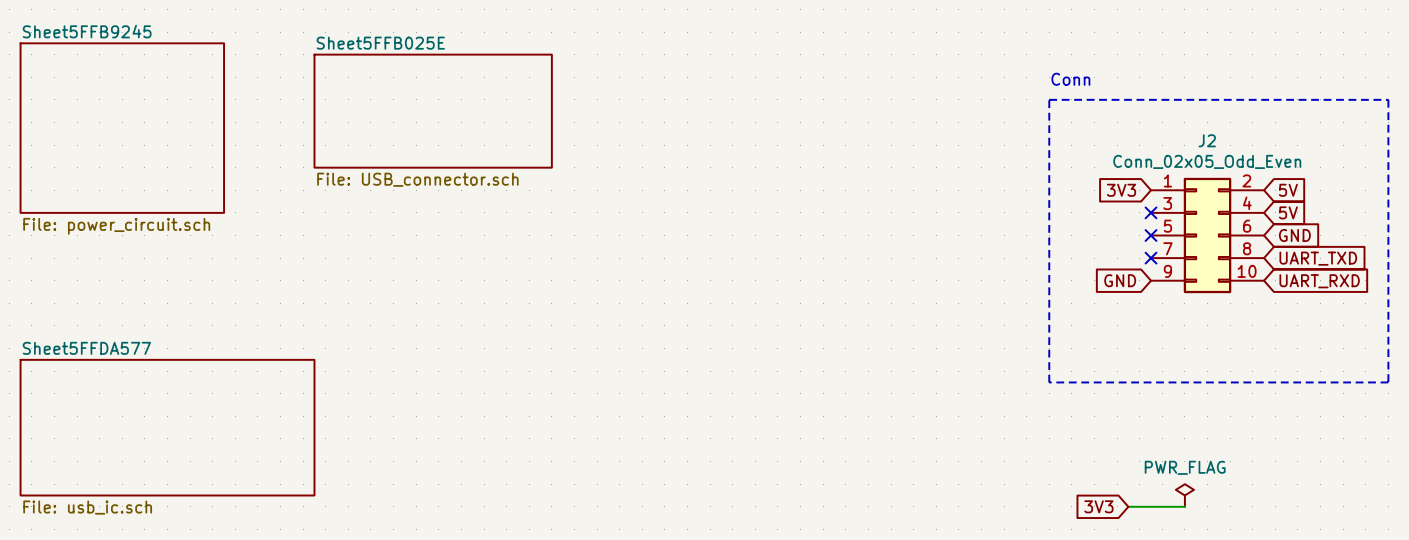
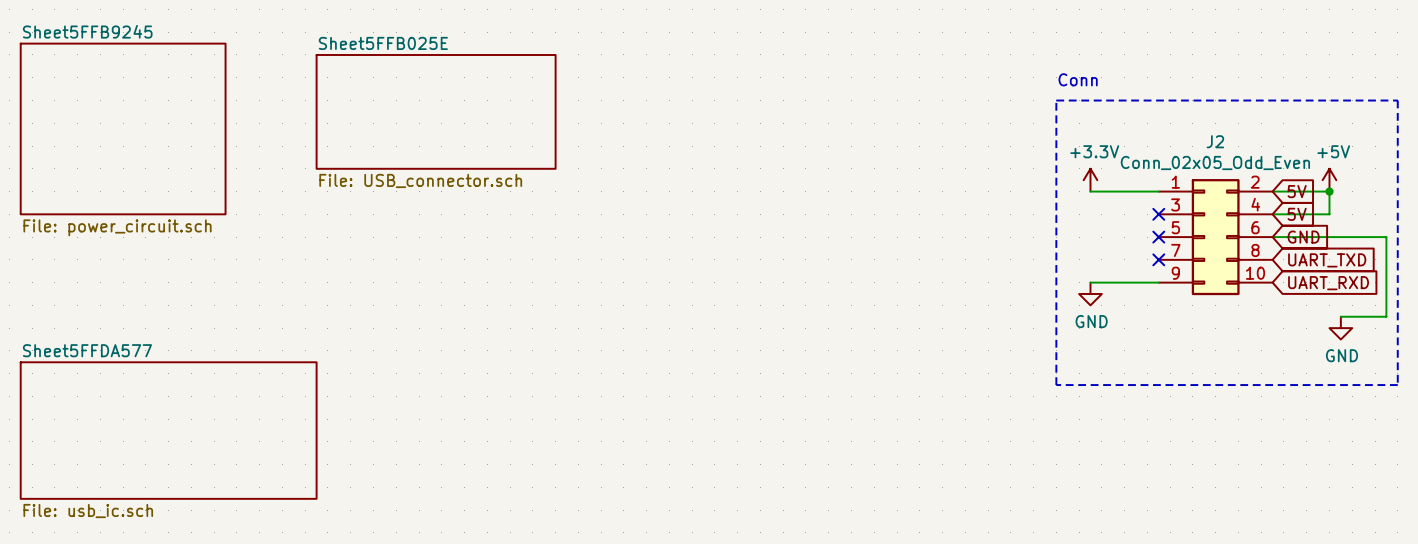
power symbol: none -> +3.3V (1090, 180)
power symbol: none -> +5V (1329, 180)
wire: none -> (1090, 191) (1158, 191)
global label: 3V3 (1121, 190) -> none
wire: none -> (1272, 191) (1329, 191) (1329, 214) (1272, 214)
junction: none -> (1329, 191)
wire: none -> (1272, 237) (1386, 237) (1386, 316) (1340, 316)
wire: none -> (1090, 282) (1158, 282)
global label: GND (1120, 280) -> none
power symbol: none -> GND (1090, 293)
power symbol: none -> GND (1340, 328)
power symbol: PWR_FLAG (1184, 495) -> none
global label: 3V3 (1098, 506) -> none
wire: (1128, 506) (1184, 506) -> none

